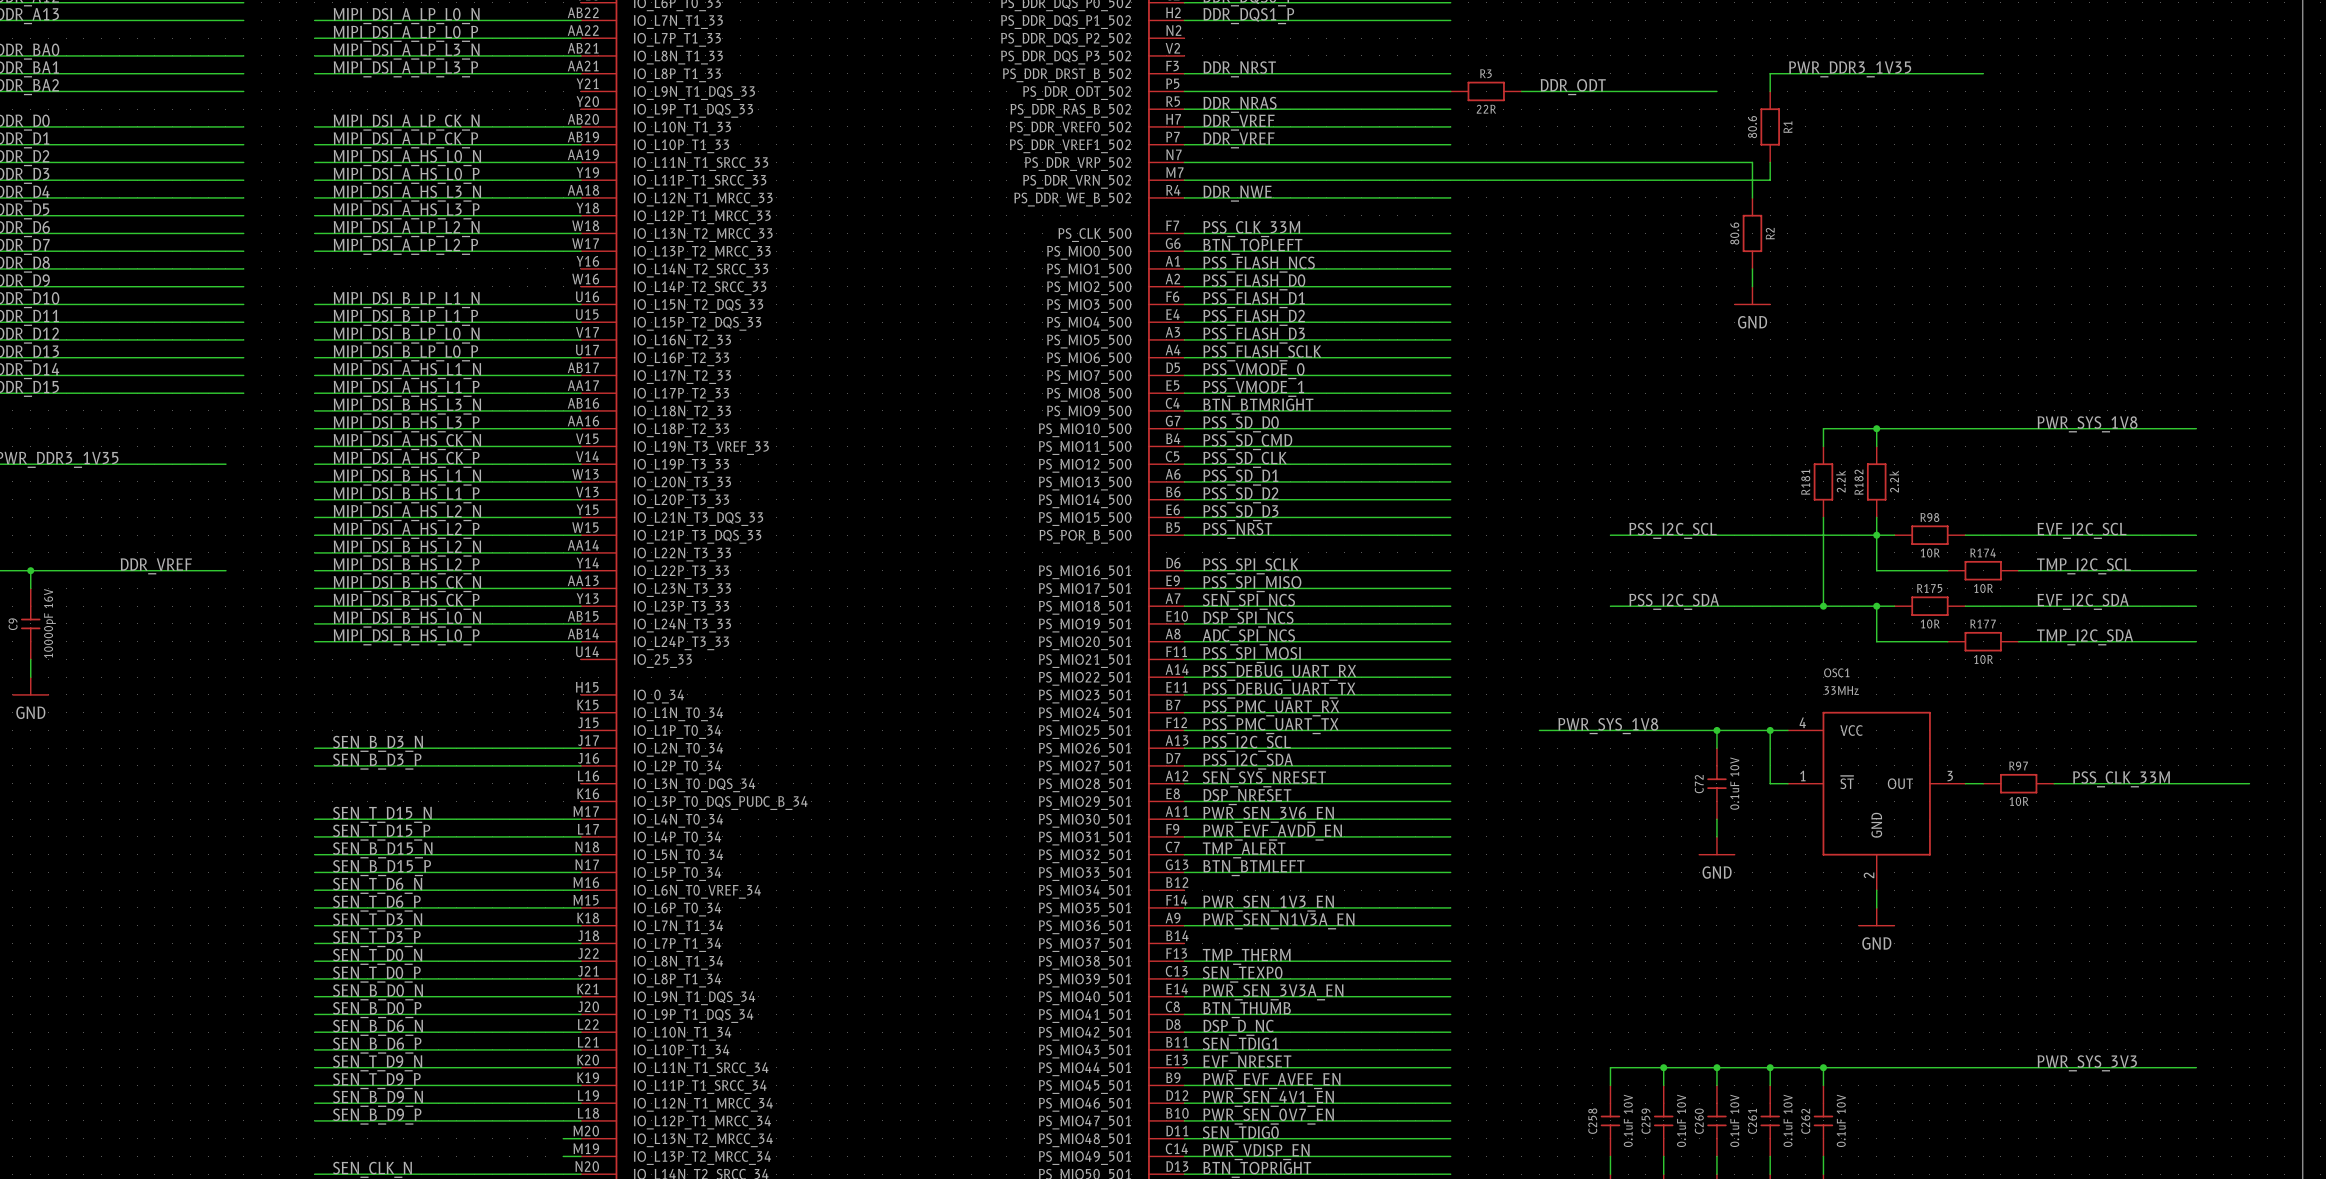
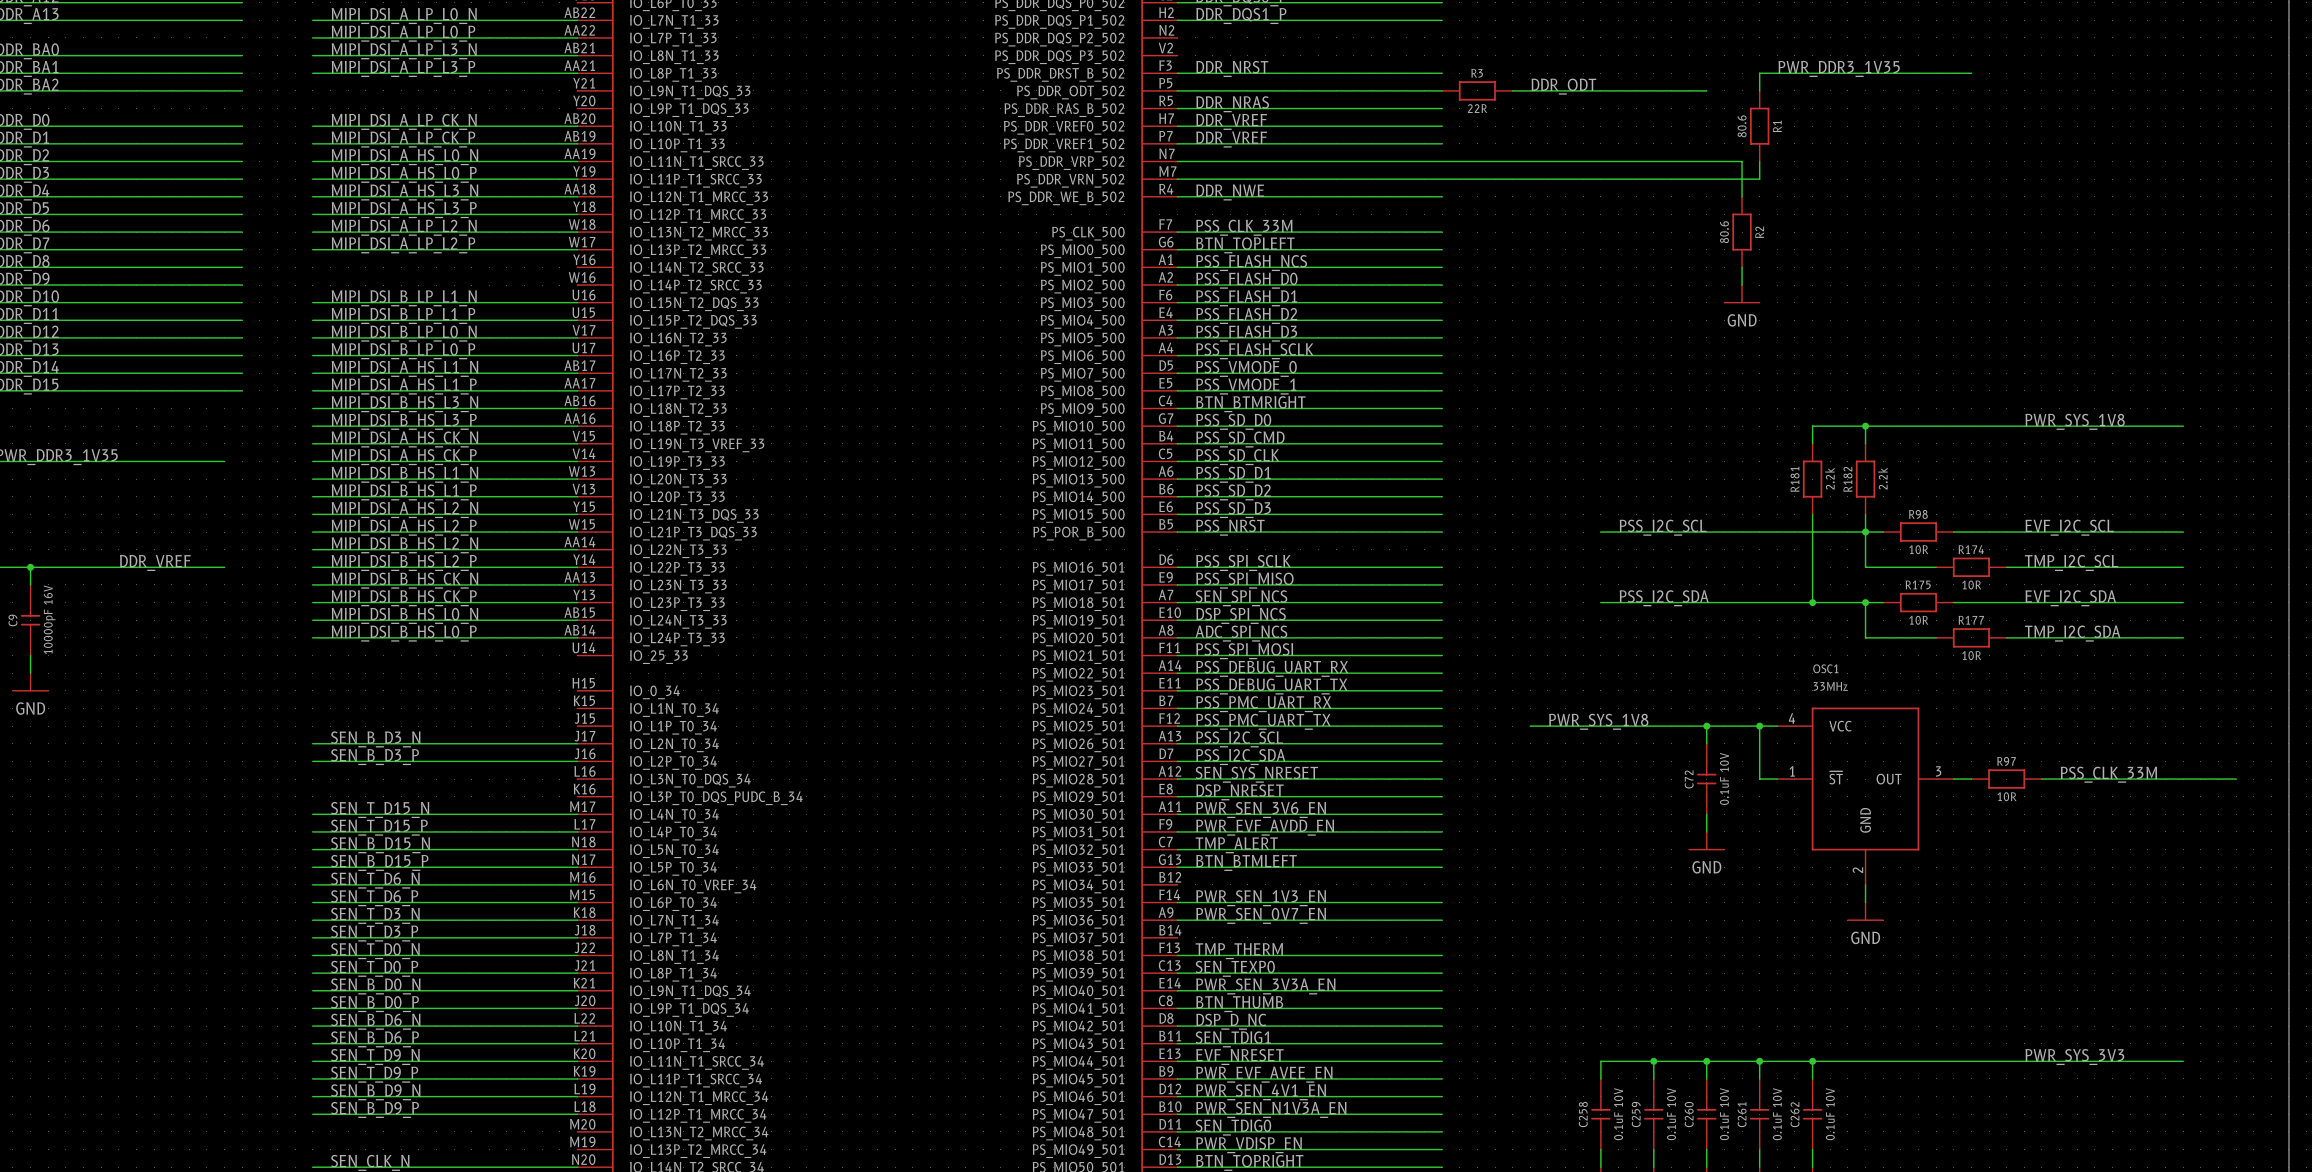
label: PWR_SEN_N1V3A_EN (1278, 921) -> PWR_SEN_0V7_EN (1261, 915)
label: PWR_SEN_0V7_EN (1268, 1116) -> PWR_SEN_N1V3A_EN (1271, 1109)
wire: (563, 1138) (580, 1138) -> none
wire: (563, 1156) (580, 1156) -> none

